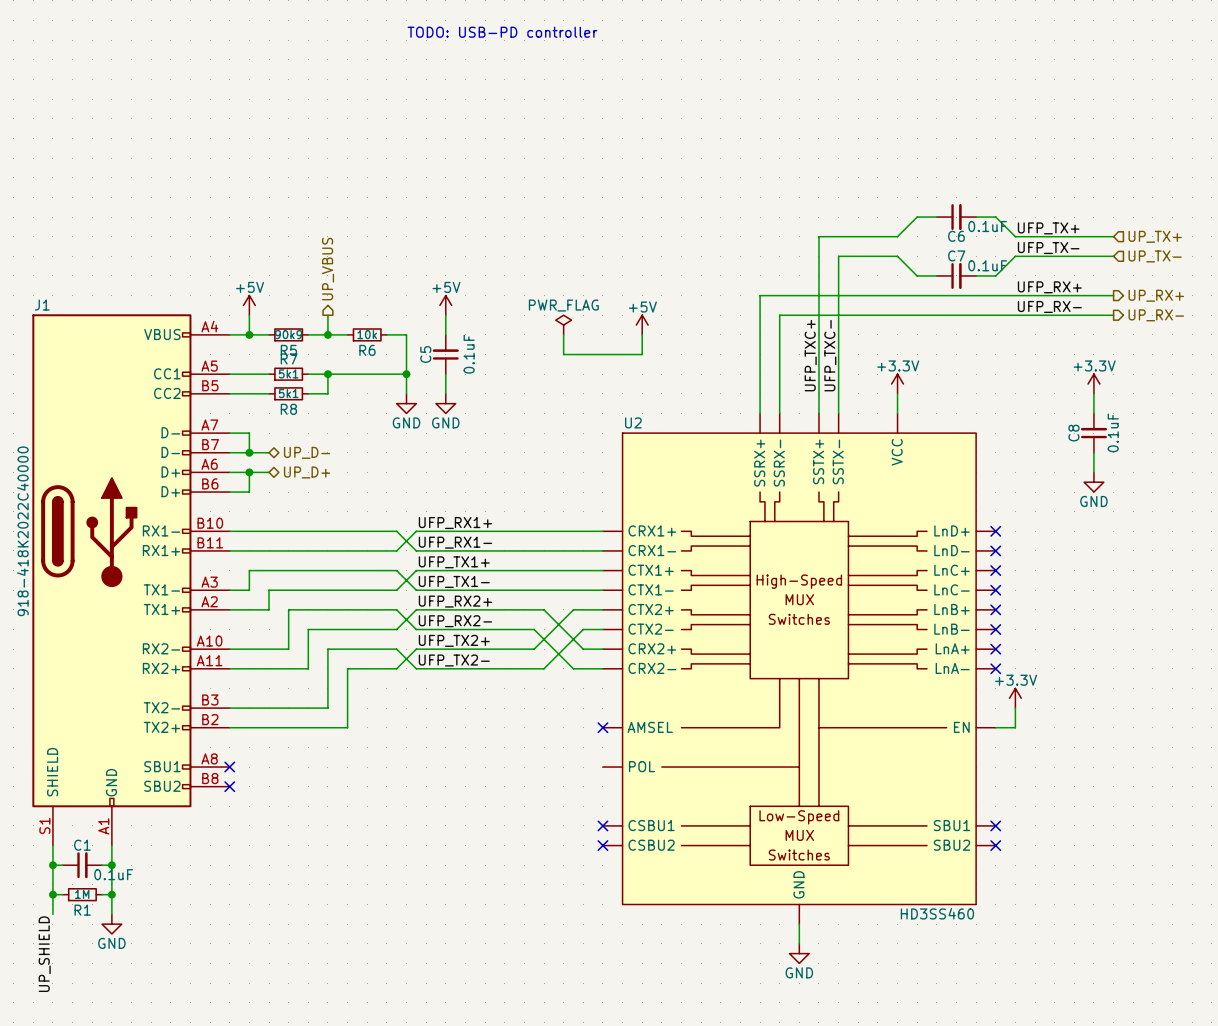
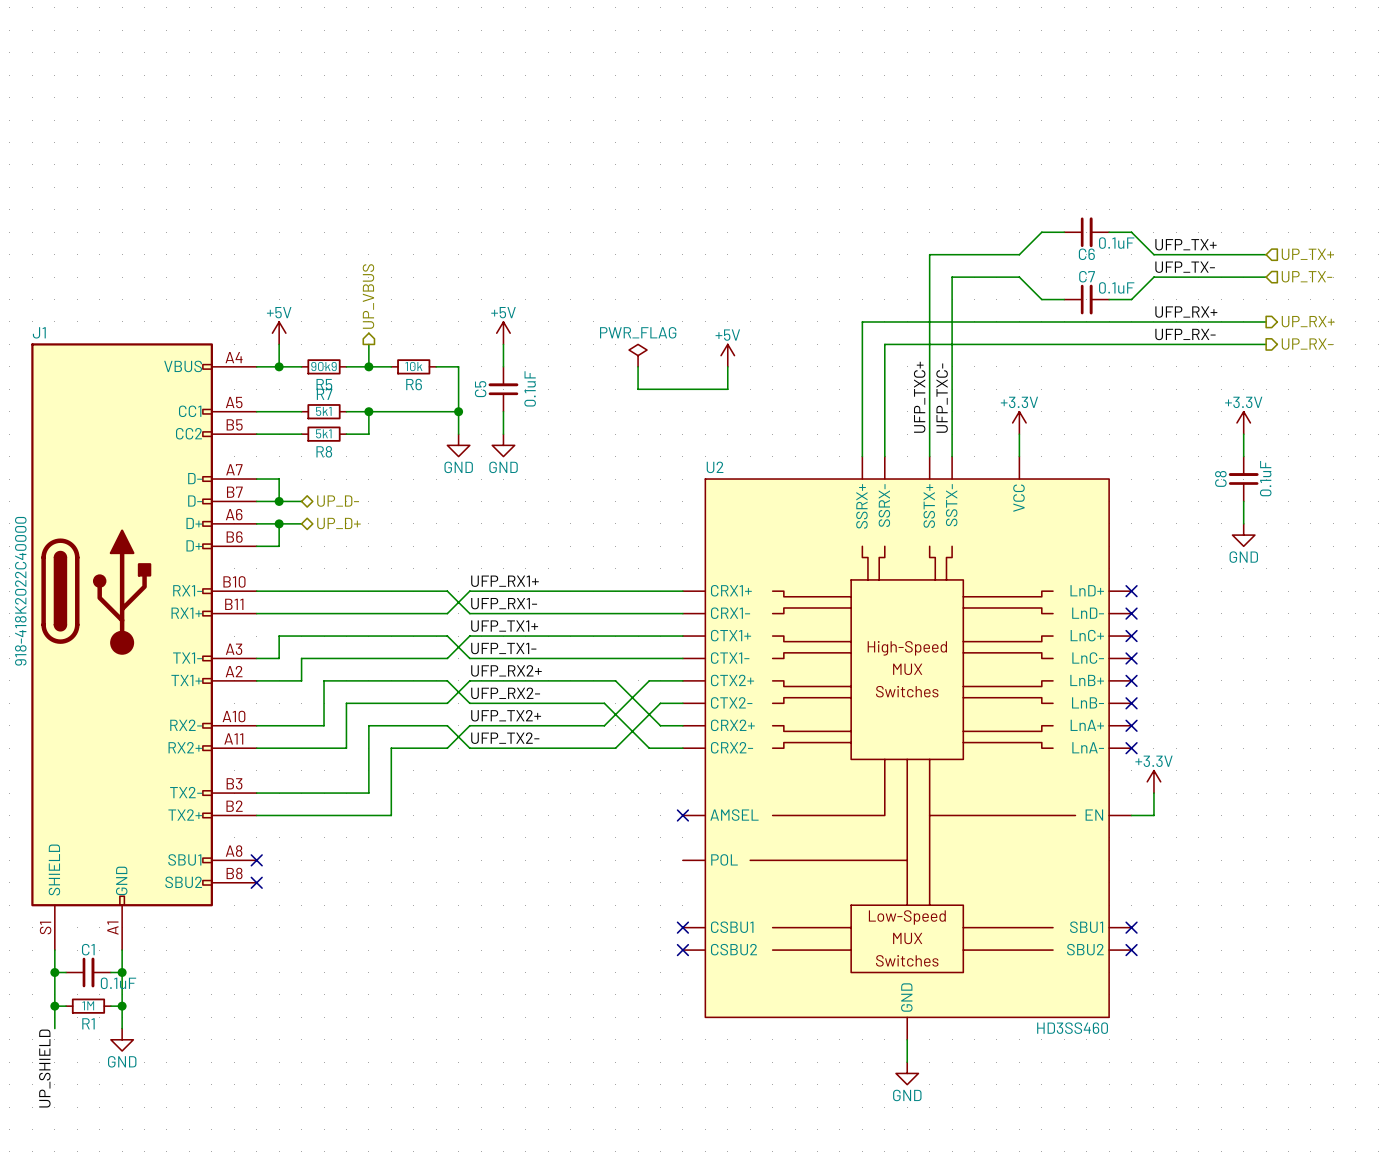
text: TODO: USB-PD controller (502, 32) -> none

